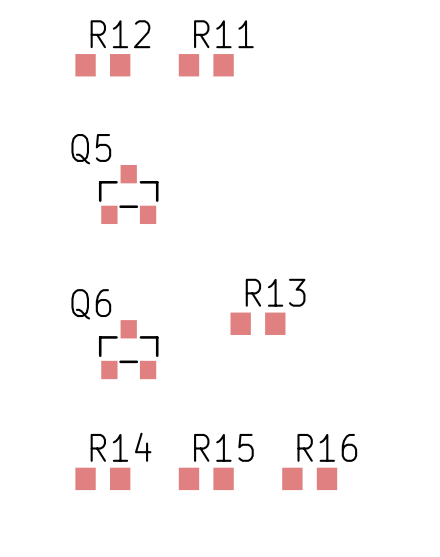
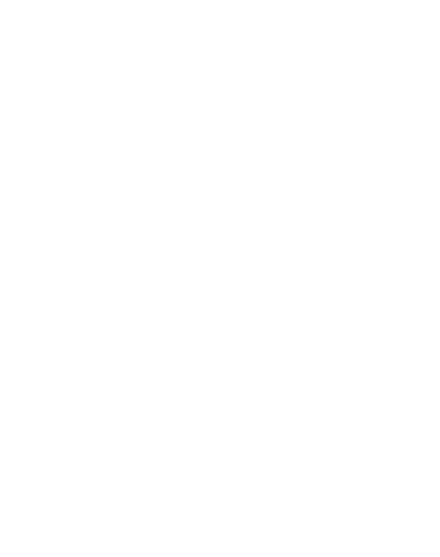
R12: (102, 65) -> none
R11: (206, 65) -> none
Q5: (128, 194) -> none
R13: (257, 323) -> none
Q6: (128, 349) -> none
R14: (102, 478) -> none
R15: (206, 478) -> none
R16: (309, 478) -> none

